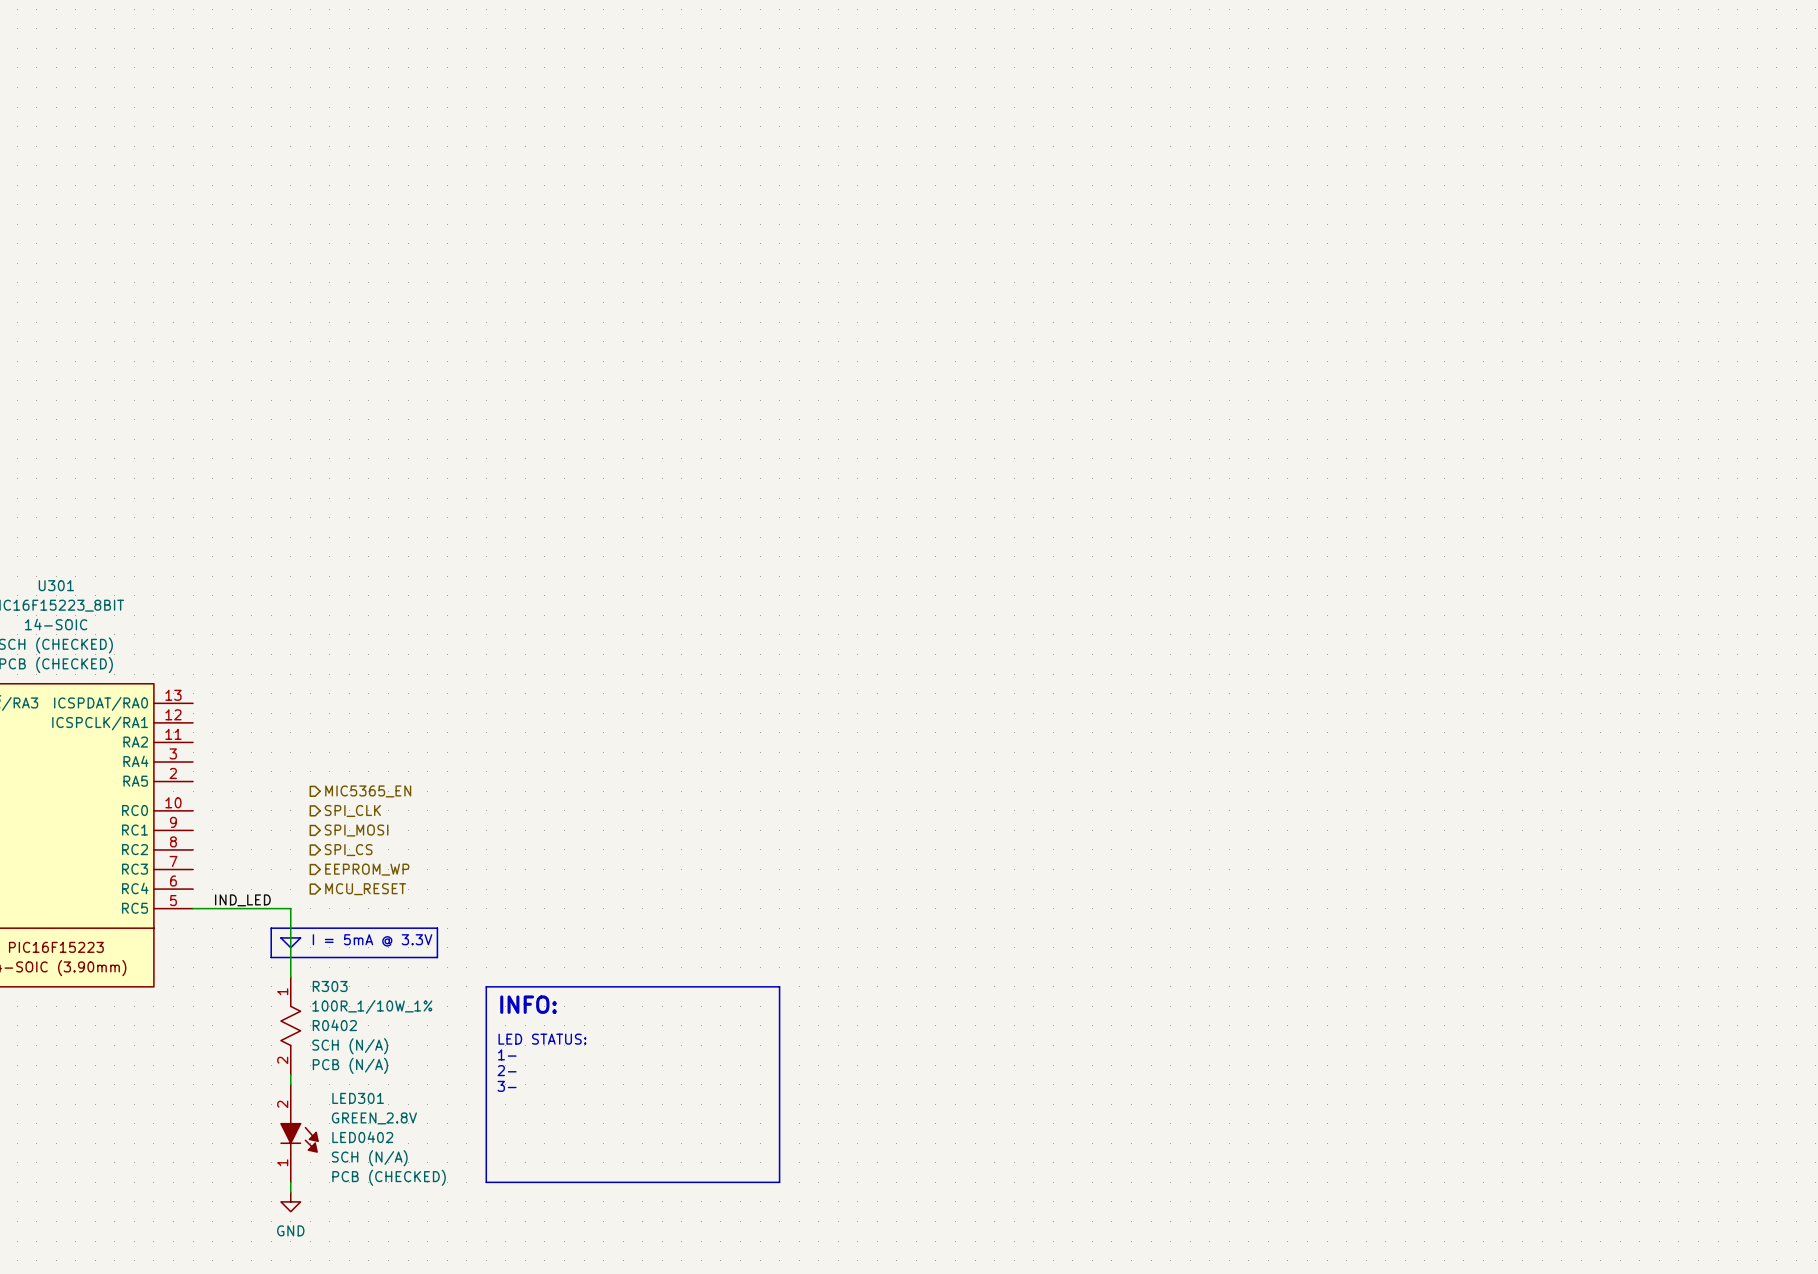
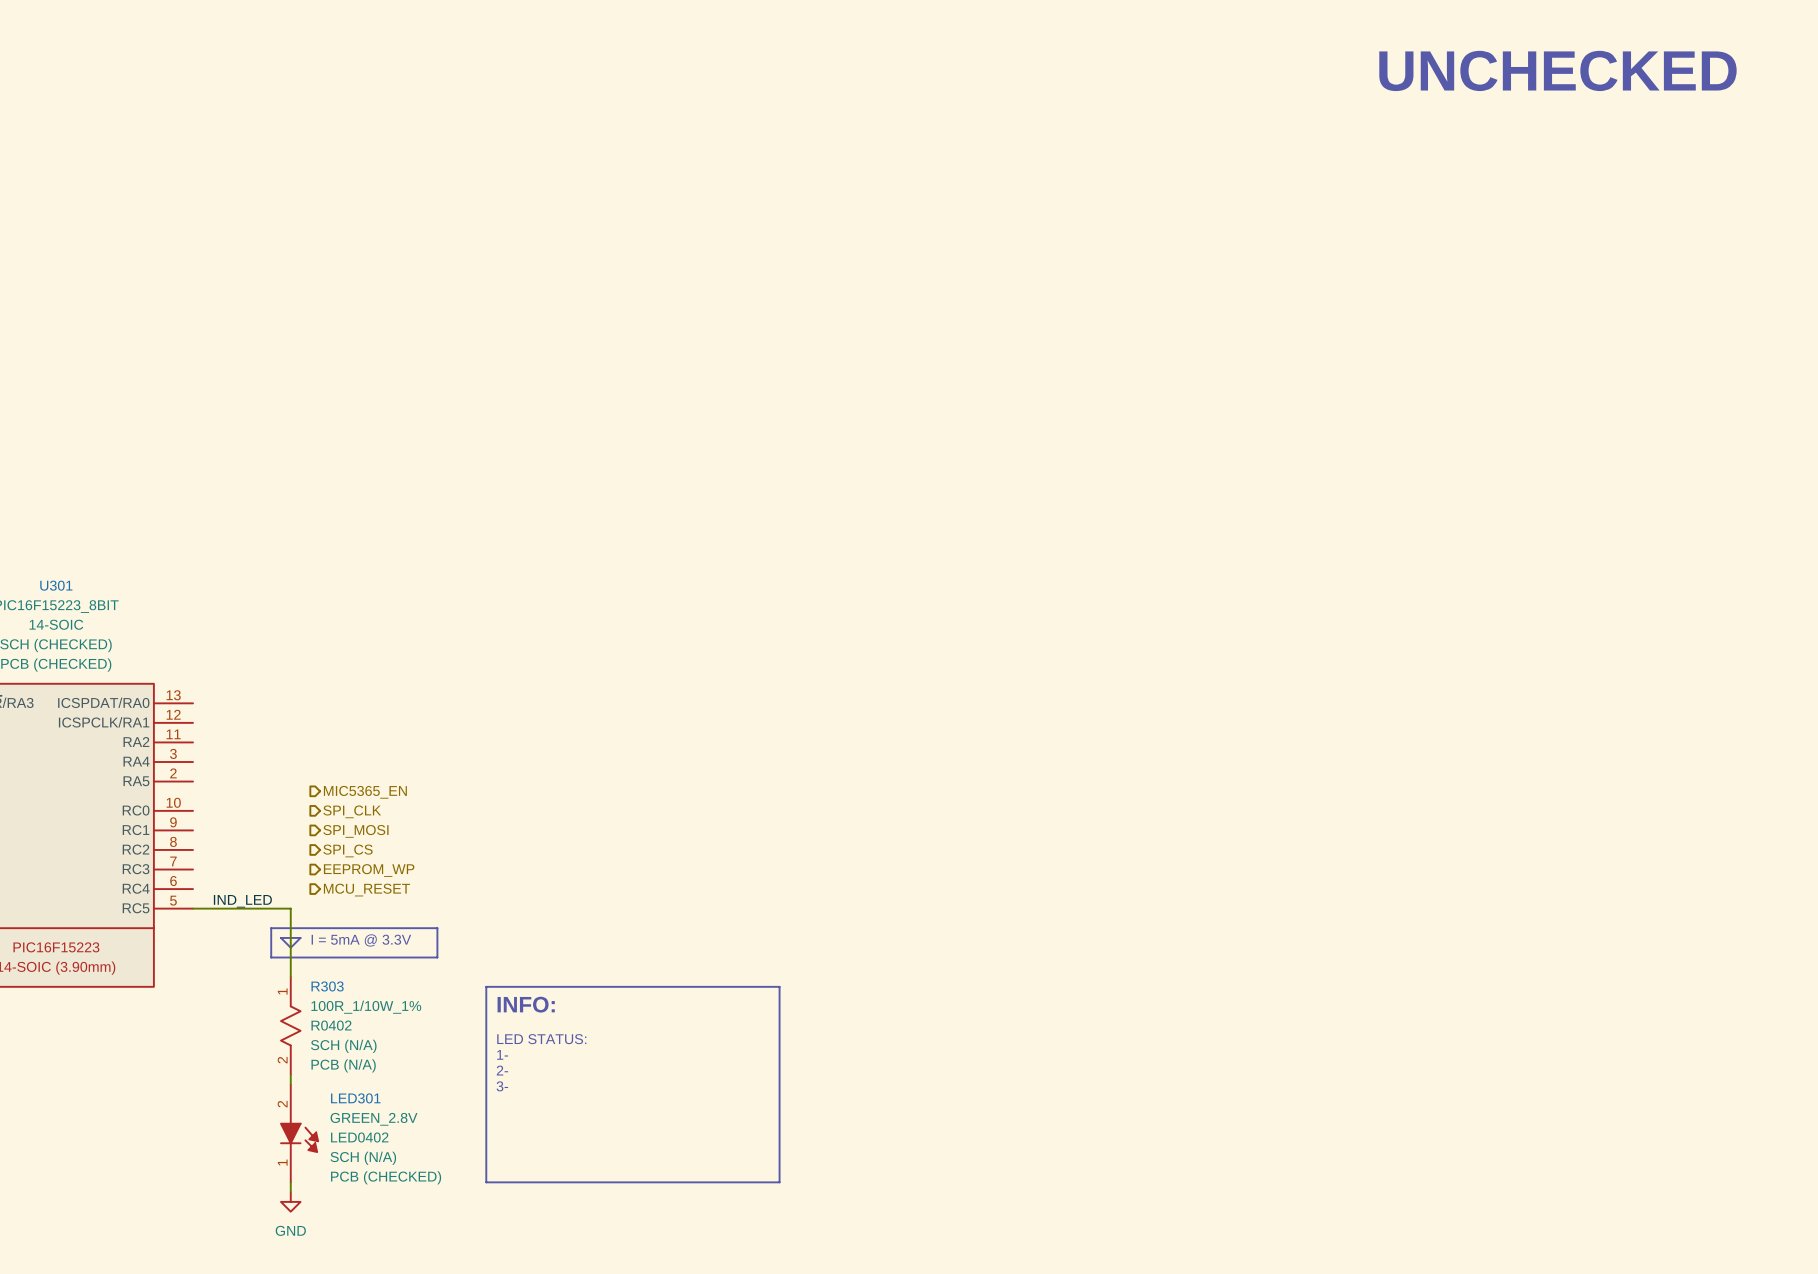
text: none -> UNCHECKED (1557, 70)

